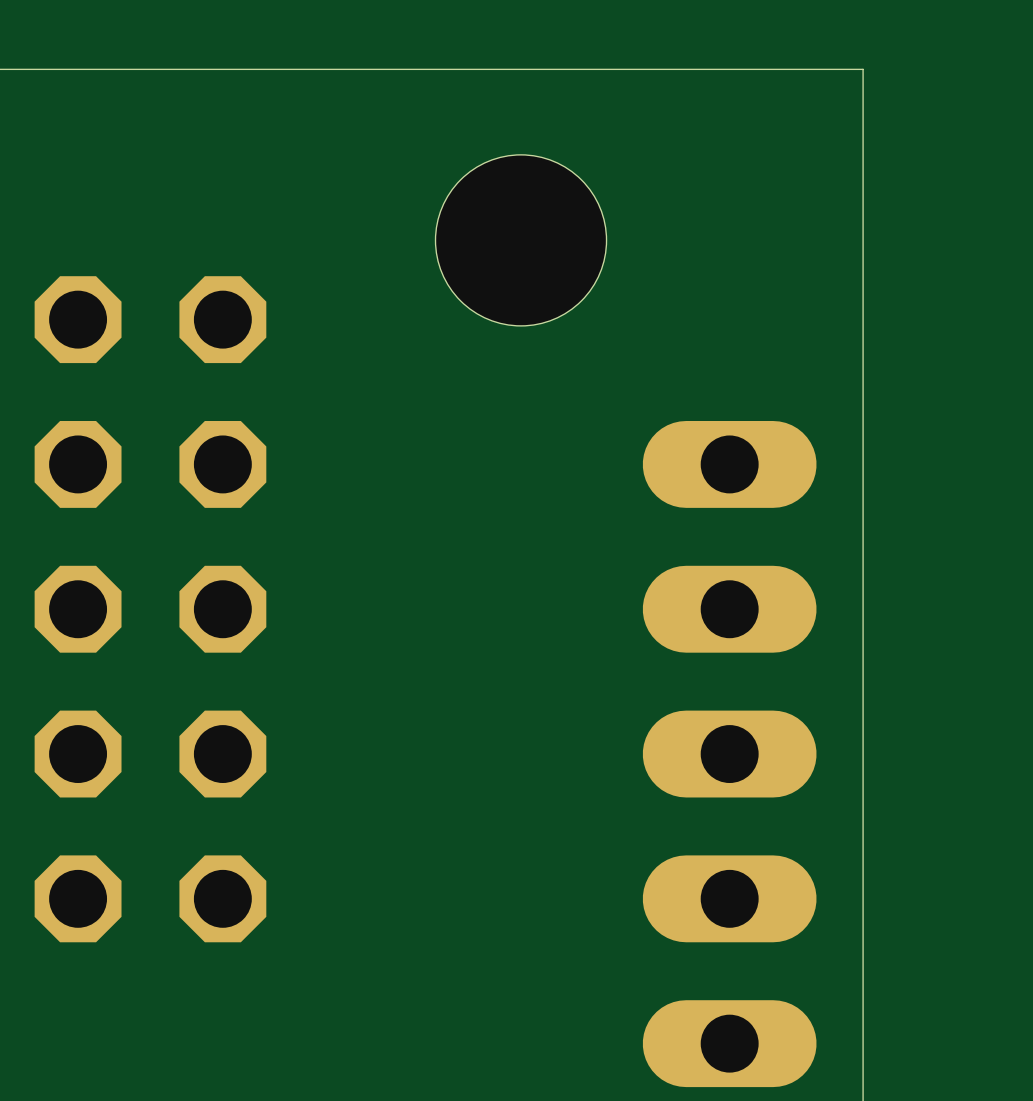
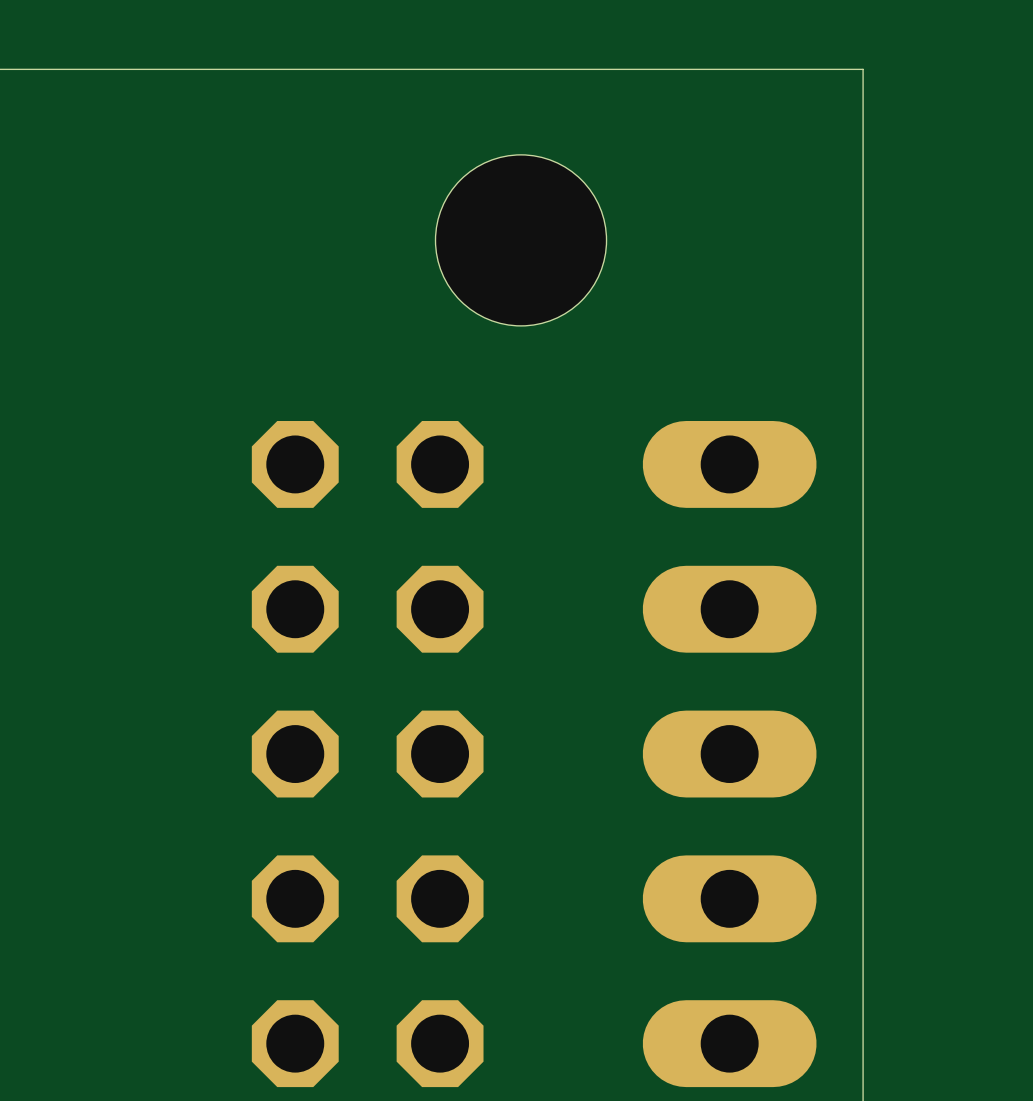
part position: (150, 609) -> (367, 754)

